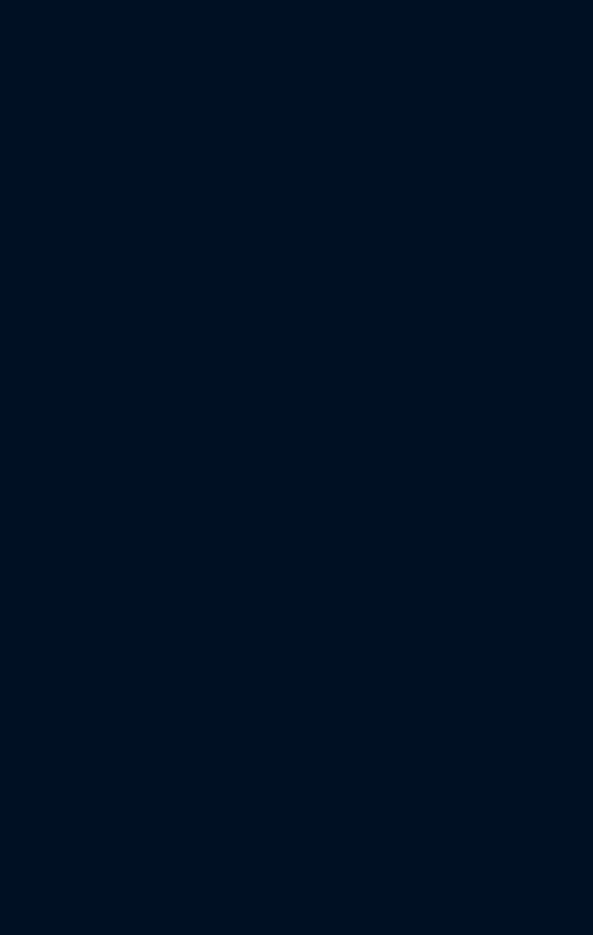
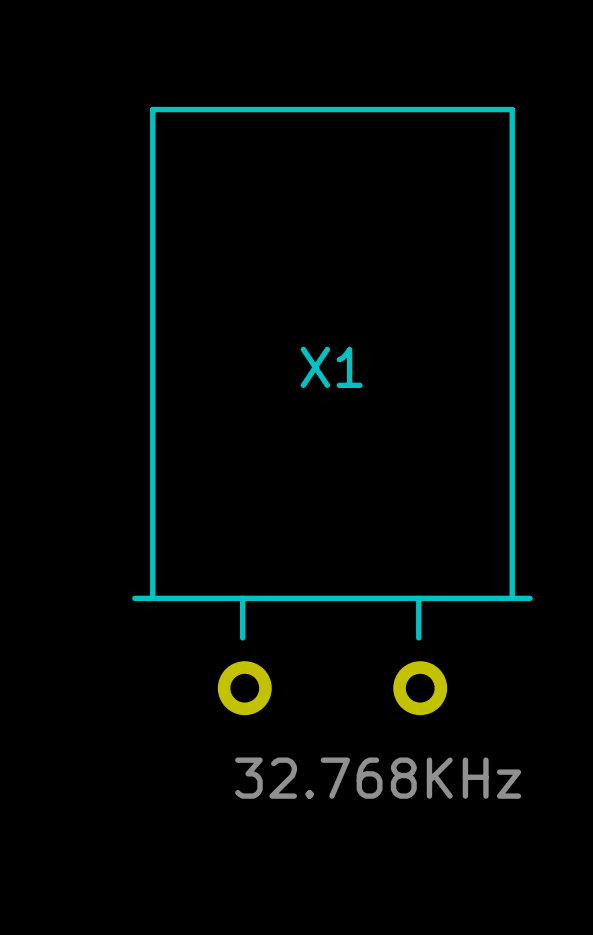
X1: none -> 32.768KHz (332, 411)

